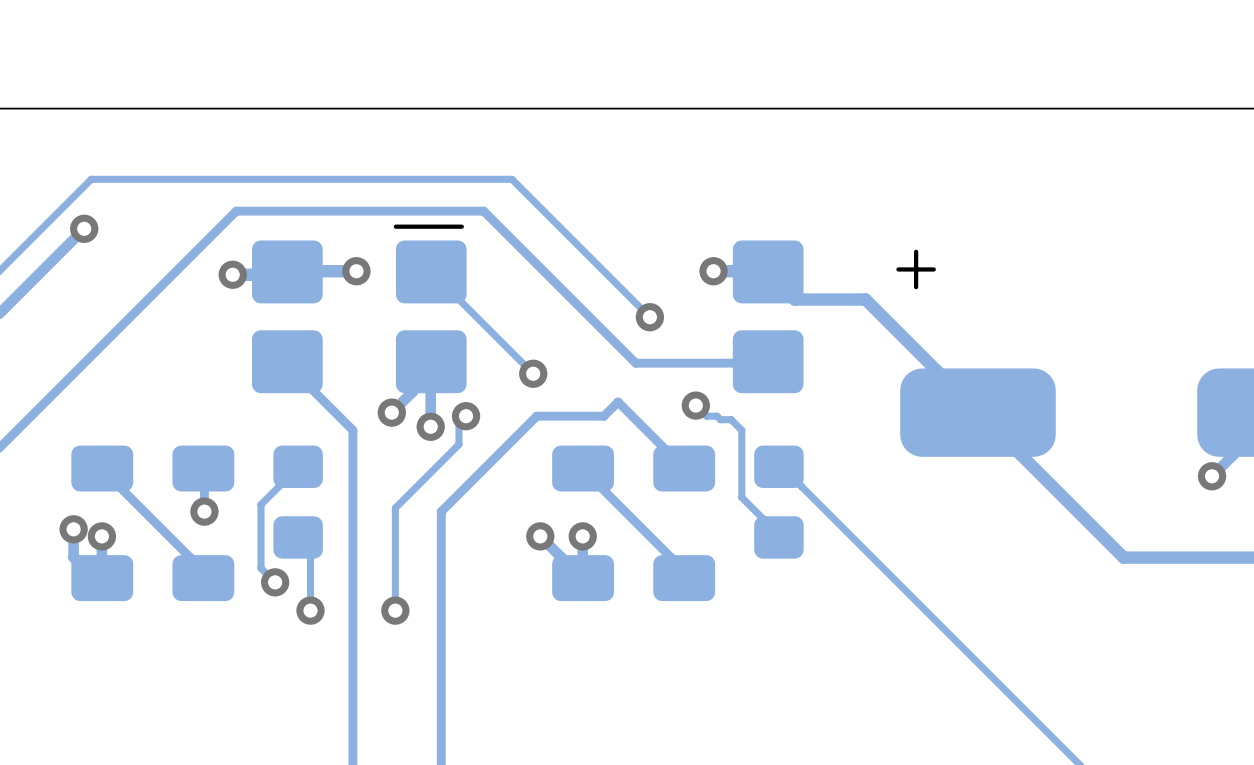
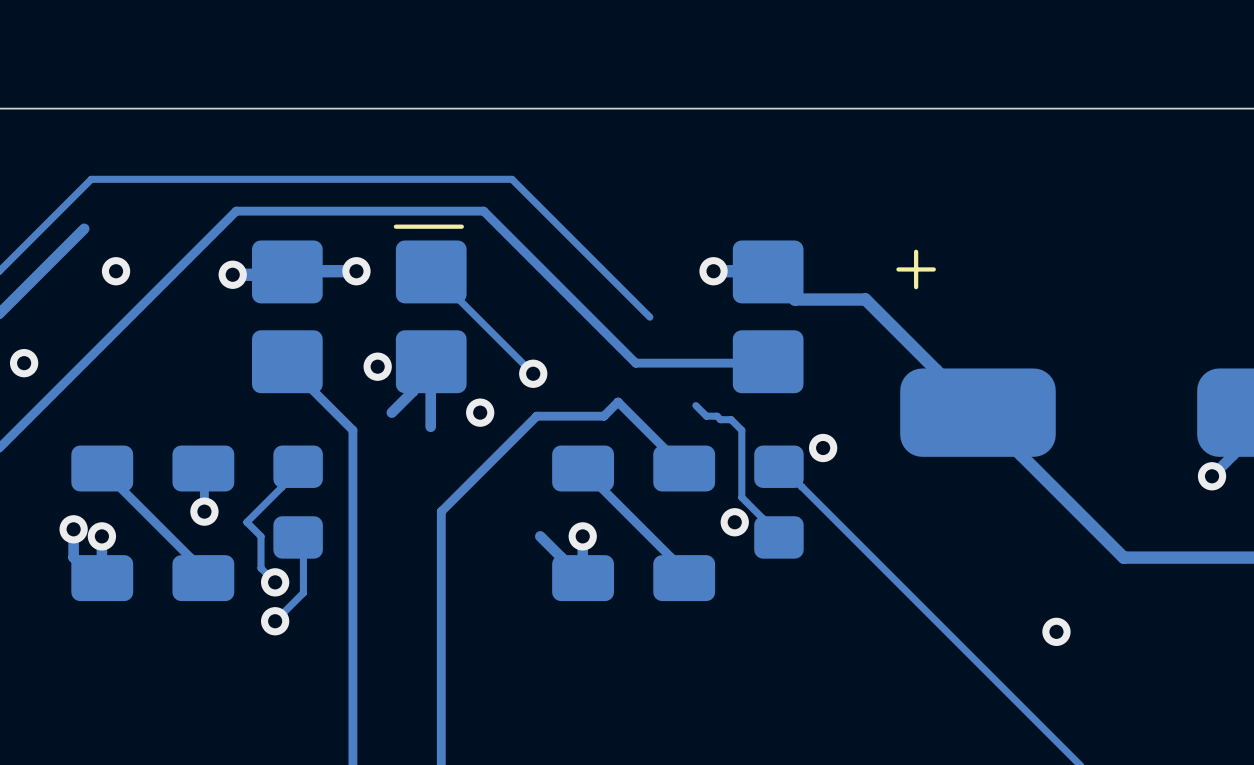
via position: (84, 228) -> (116, 271)
via: (649, 317) -> none
via: none -> (24, 363)
via: none -> (377, 366)
via: (695, 405) -> none
via: (391, 412) -> none
track: (466, 416) (458, 423) (458, 444) (395, 508) (395, 610) -> none
via position: (466, 416) -> (480, 412)
via: (430, 426) -> none
via: none -> (823, 448)
track: (298, 466) (261, 504) (261, 536) -> (298, 466) (282, 486) (246, 522) (261, 536)
via: none -> (734, 522)
via: (540, 536) -> none
track: (298, 537) (310, 557) (310, 610) -> (298, 537) (303, 557) (303, 592) (275, 621)
via position: (310, 610) -> (275, 621)
via: (395, 610) -> none
via: none -> (1056, 631)

